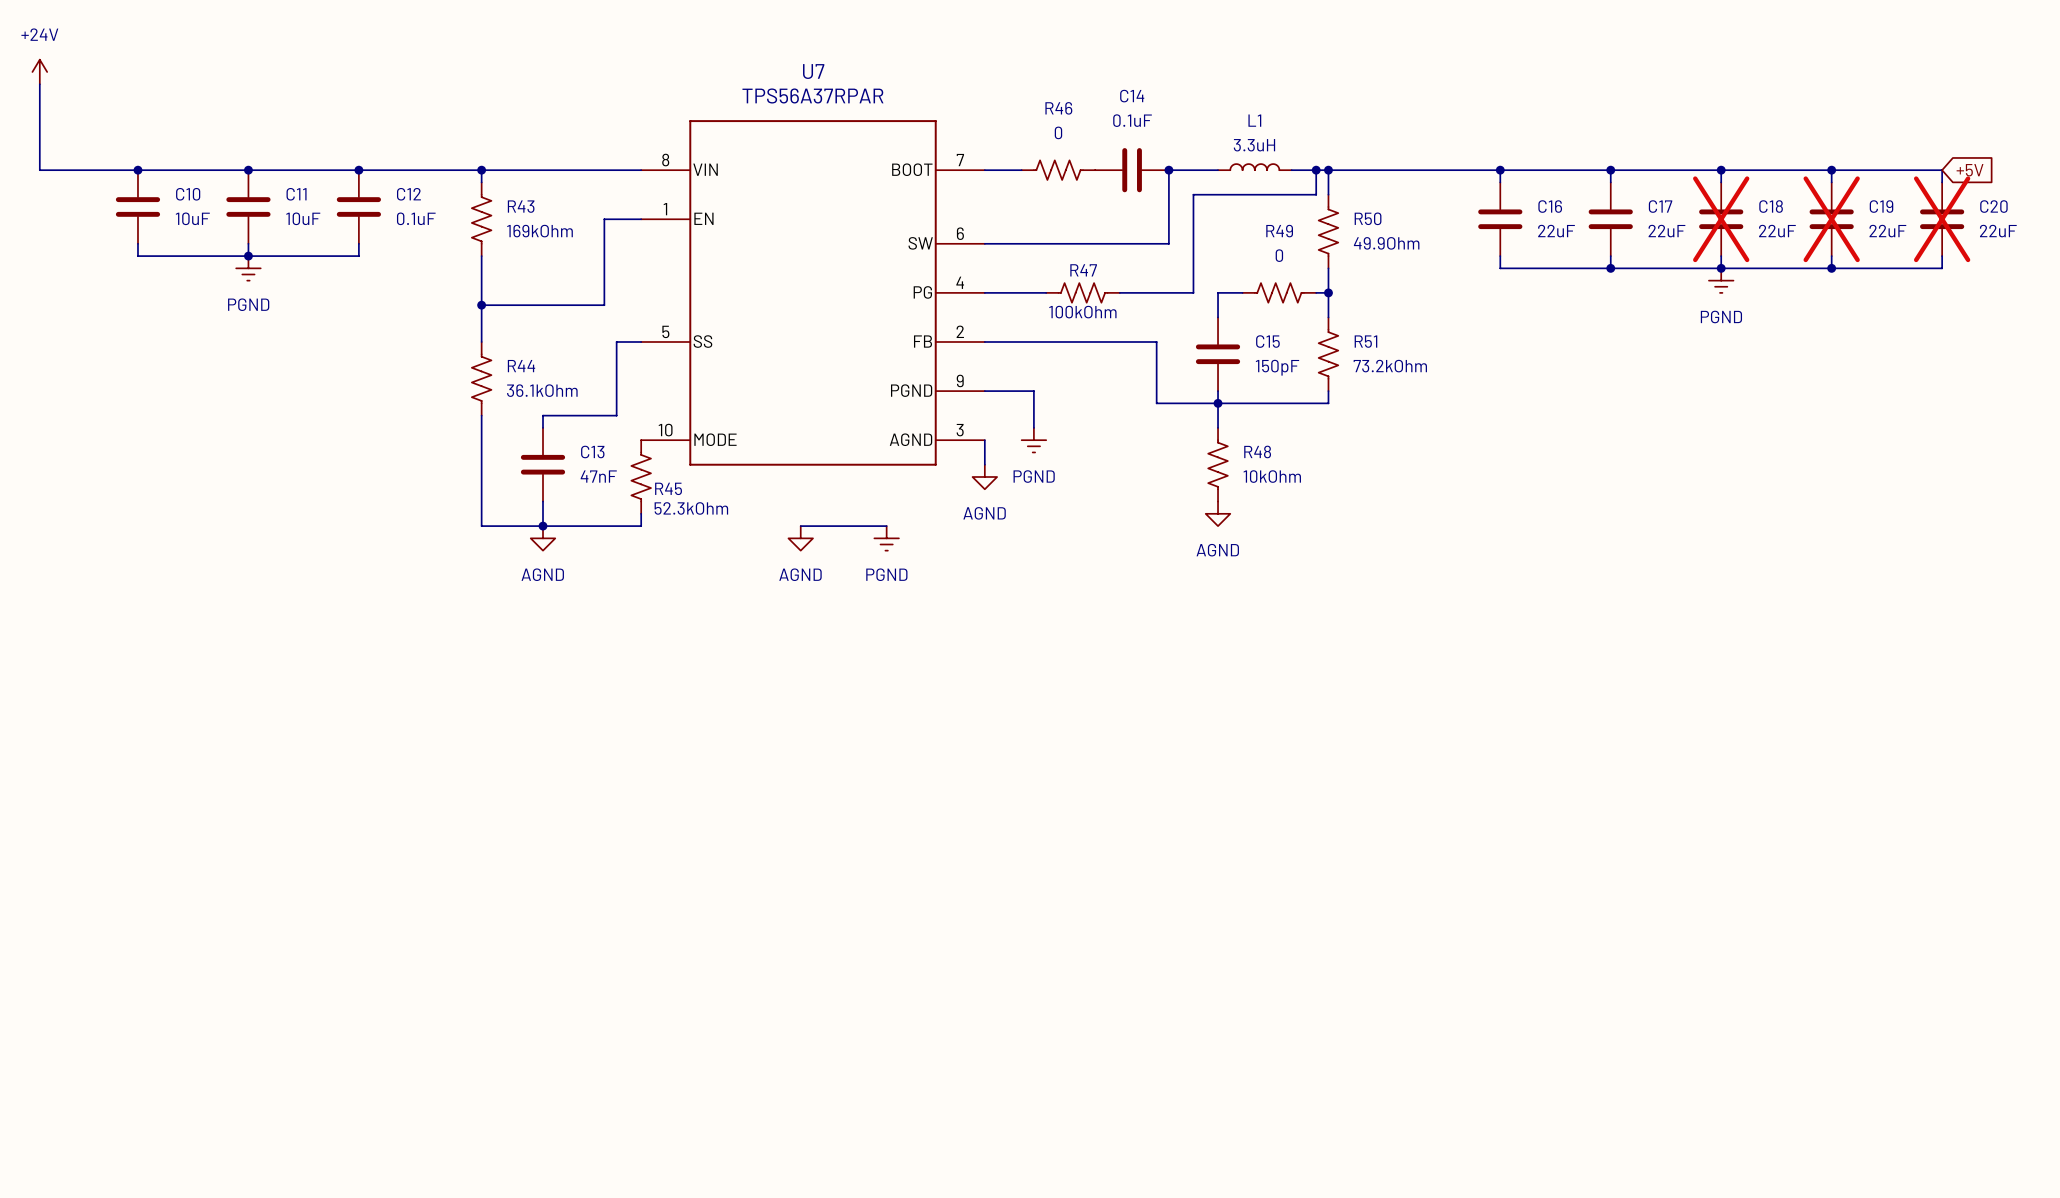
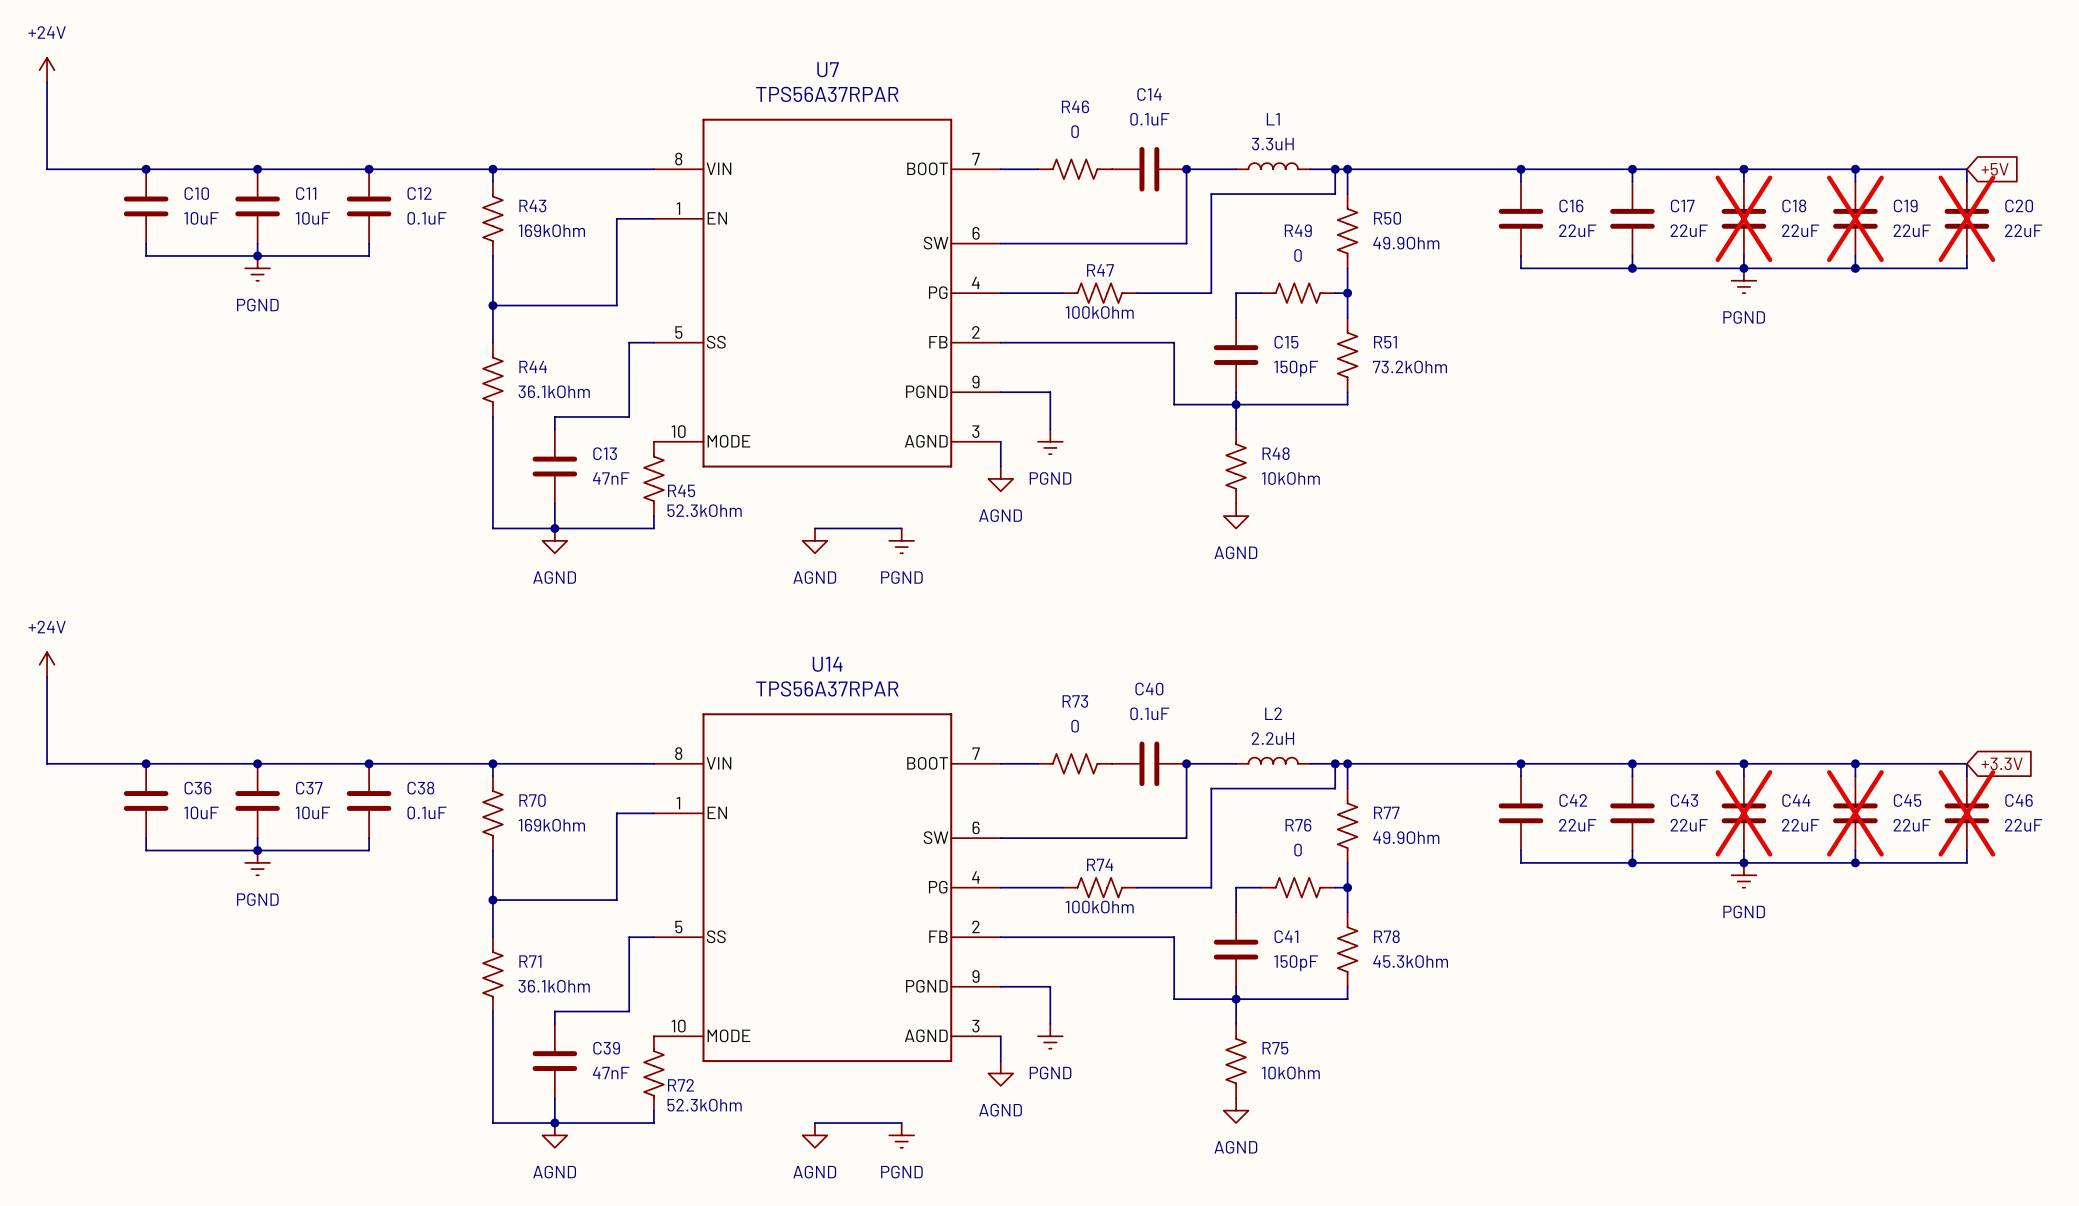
power symbol: none -> +24V (47, 664)
wire: none -> (47, 677) (47, 763) (653, 763)
L2: none -> 2.2uH (1273, 760)
junction: none -> (146, 763)
junction: none -> (257, 763)
junction: none -> (369, 763)
wire: none -> (492, 763) (492, 776)
junction: none -> (492, 763)
wire: none -> (1000, 763) (1037, 763)
R73: none -> 0 (1075, 763)
C40: none -> 0.1uF (1149, 763)
junction: none -> (1186, 763)
wire: none -> (1236, 763) (1186, 763) (1186, 838) (1000, 838)
wire: none -> (1310, 763) (1966, 763) (1966, 776)
wire: none -> (1335, 763) (1335, 788) (1211, 788) (1211, 887) (1137, 887)
junction: none -> (1335, 763)
wire: none -> (1347, 763) (1347, 788)
junction: none -> (1347, 763)
wire: none -> (1520, 763) (1520, 776)
junction: none -> (1520, 763)
wire: none -> (1632, 763) (1632, 776)
junction: none -> (1632, 763)
wire: none -> (1743, 763) (1743, 776)
junction: none -> (1743, 763)
wire: none -> (1855, 763) (1855, 776)
junction: none -> (1855, 763)
global label: none -> +3.3V (2002, 763)
C36: none -> 10uF (146, 800)
C37: none -> 10uF (257, 800)
C38: none -> 0.1uF (369, 800)
R70: none -> 169kOhm (492, 813)
wire: none -> (653, 813) (616, 813) (616, 900) (492, 900)
C42: none -> 22uF (1520, 813)
C43: none -> 22uF (1632, 813)
C44: none -> 22uF (1743, 813)
C45: none -> 22uF (1855, 813)
C46: none -> 22uF (1966, 813)
R77: none -> 49.9Ohm (1347, 825)
wire: none -> (146, 838) (146, 850) (369, 850) (369, 838)
wire: none -> (257, 838) (257, 850)
junction: none -> (257, 850)
wire: none -> (492, 850) (492, 937)
wire: none -> (1520, 850) (1520, 862) (1966, 862) (1966, 850)
wire: none -> (1632, 850) (1632, 862)
wire: none -> (1743, 850) (1743, 862)
wire: none -> (1855, 850) (1855, 862)
power symbol: none -> PGND (257, 862)
wire: none -> (1347, 862) (1347, 912)
junction: none -> (1632, 862)
junction: none -> (1743, 862)
junction: none -> (1855, 862)
power symbol: none -> PGND (1743, 875)
U14: none -> TPS56A37RPAR (827, 887)
wire: none -> (1000, 887) (1062, 887)
R74: none -> 100kOhm (1099, 887)
wire: none -> (1260, 887) (1236, 887) (1236, 912)
R76: none -> 0 (1298, 887)
wire: none -> (1335, 887) (1347, 887)
junction: none -> (1347, 887)
junction: none -> (492, 900)
wire: none -> (653, 937) (629, 937) (629, 1011) (554, 1011) (554, 1023)
wire: none -> (1000, 937) (1174, 937) (1174, 999) (1347, 999) (1347, 986)
C41: none -> 150pF (1236, 949)
R78: none -> 45.3kOhm (1347, 949)
R71: none -> 36.1kOhm (492, 974)
wire: none -> (1000, 986) (1050, 986) (1050, 1023)
wire: none -> (1236, 986) (1236, 1023)
junction: none -> (1236, 999)
wire: none -> (492, 1011) (492, 1123) (653, 1123) (653, 1110)
wire: none -> (1000, 1036) (1000, 1061)
power symbol: none -> PGND (1050, 1036)
C39: none -> 47nF (554, 1061)
R75: none -> 10kOhm (1236, 1061)
R72: none -> 52.3kOhm (653, 1073)
power symbol: none -> AGND (1000, 1073)
wire: none -> (554, 1098) (554, 1123)
power symbol: none -> AGND (1236, 1110)
junction: none -> (554, 1123)
wire: none -> (814, 1123) (901, 1123)
power symbol: none -> AGND (554, 1135)
power symbol: none -> AGND (814, 1135)
power symbol: none -> PGND (901, 1135)

